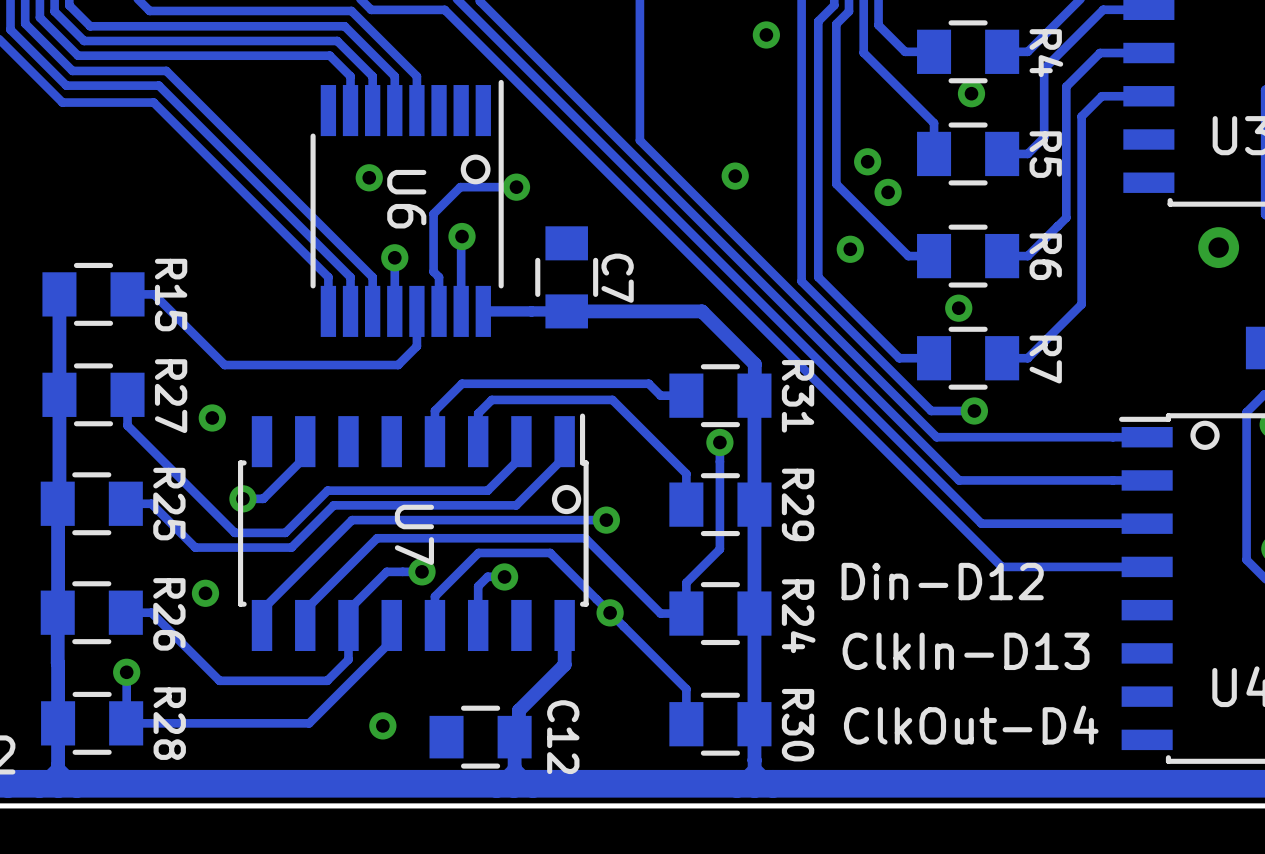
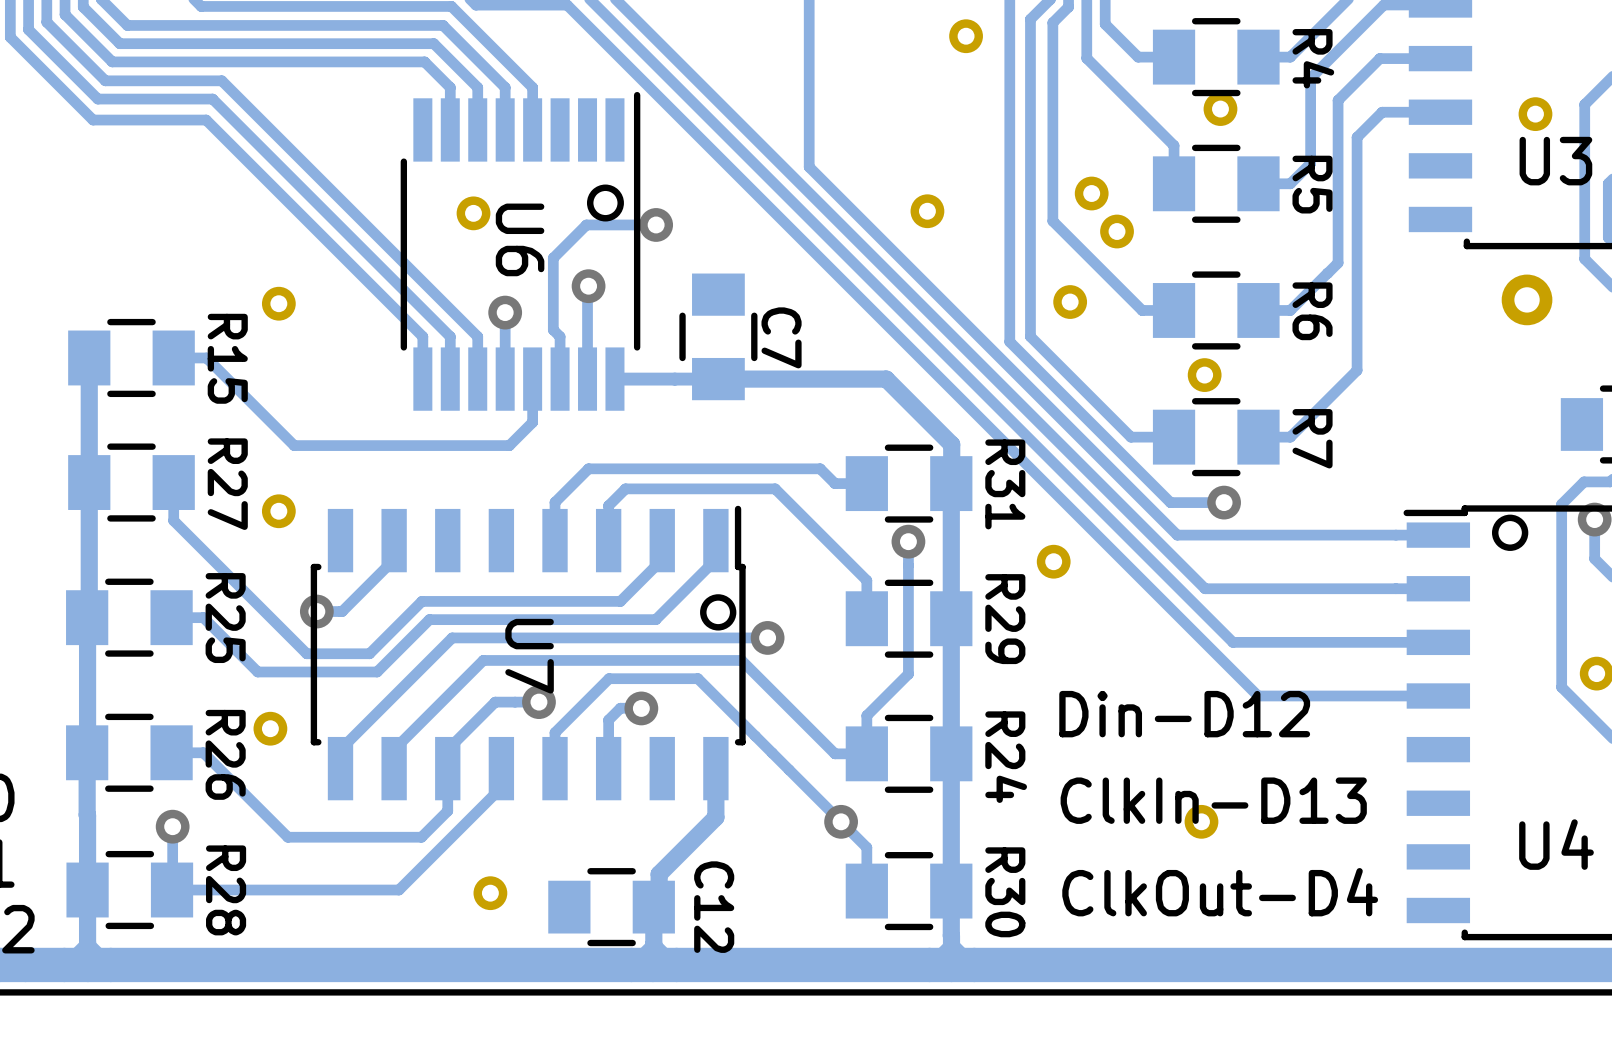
part: none -> (1535, 114)
part: none -> (278, 303)
part: none -> (1053, 561)
via position: (610, 612) -> (841, 821)
part: none -> (1201, 821)

